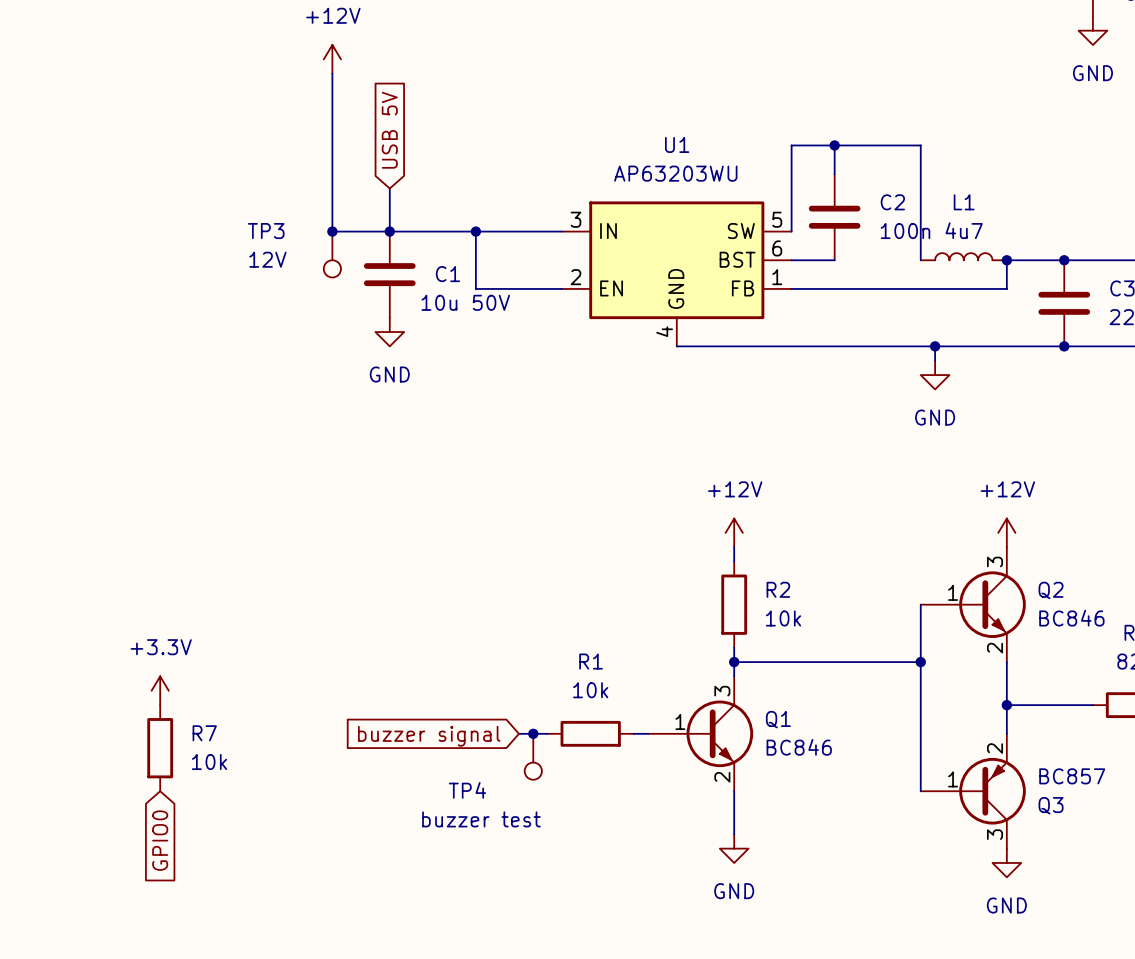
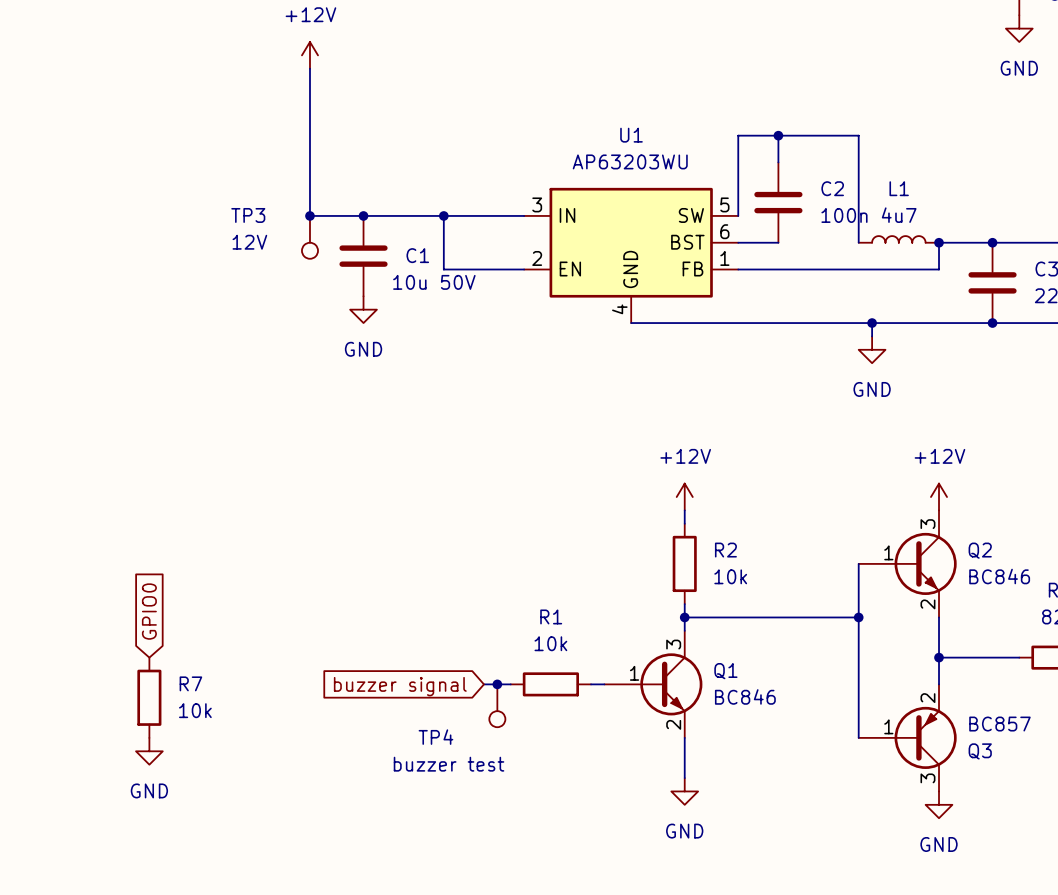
global label: USB 5V (389, 130) -> none
wire: (389, 188) (389, 231) -> none
power symbol: +3.3V (160, 690) -> none
power symbol: none -> GND (149, 751)
global label rotation: 0° (160, 840) -> 180° (149, 611)
global label position: GPIO0 (160, 840) -> GPIO0 (149, 611)

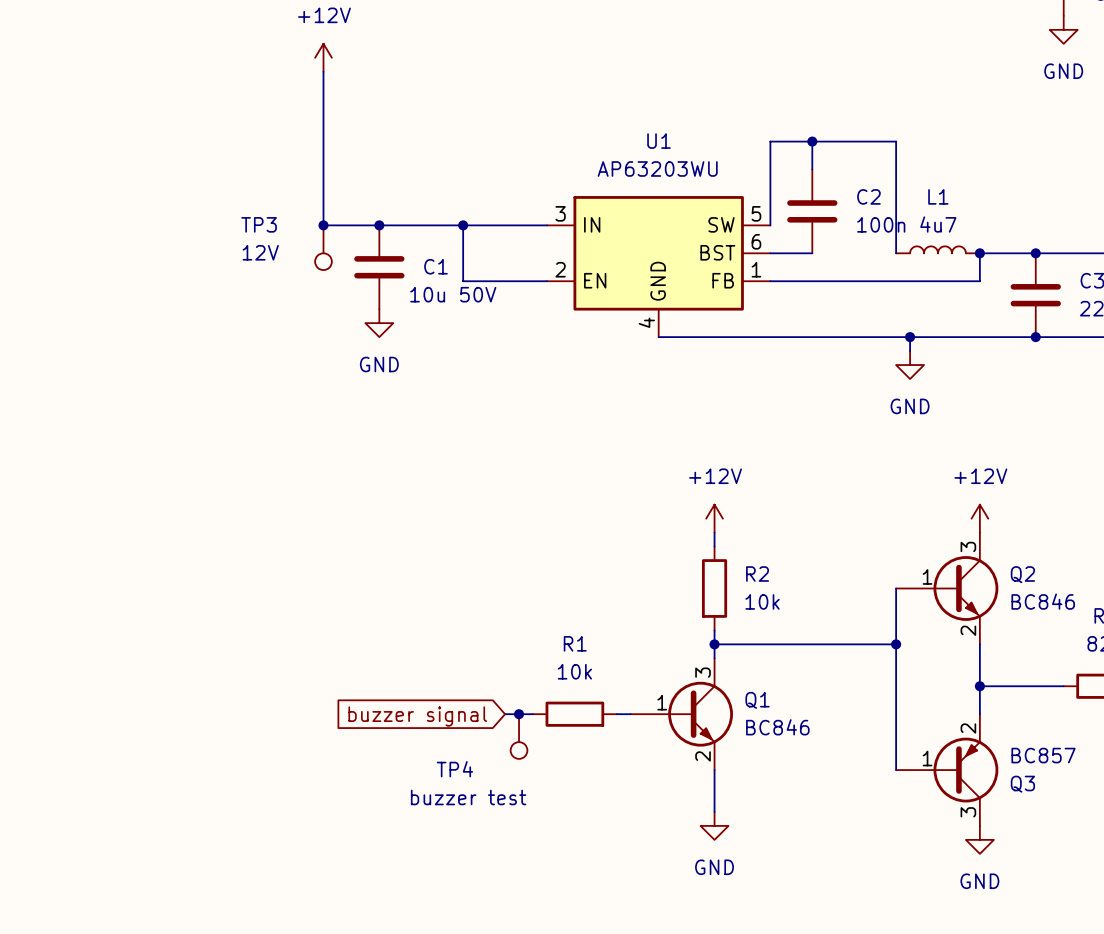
global label: GPIO0 (149, 611) -> none
R7: 10k (149, 697) -> none
power symbol: GND (149, 751) -> none

